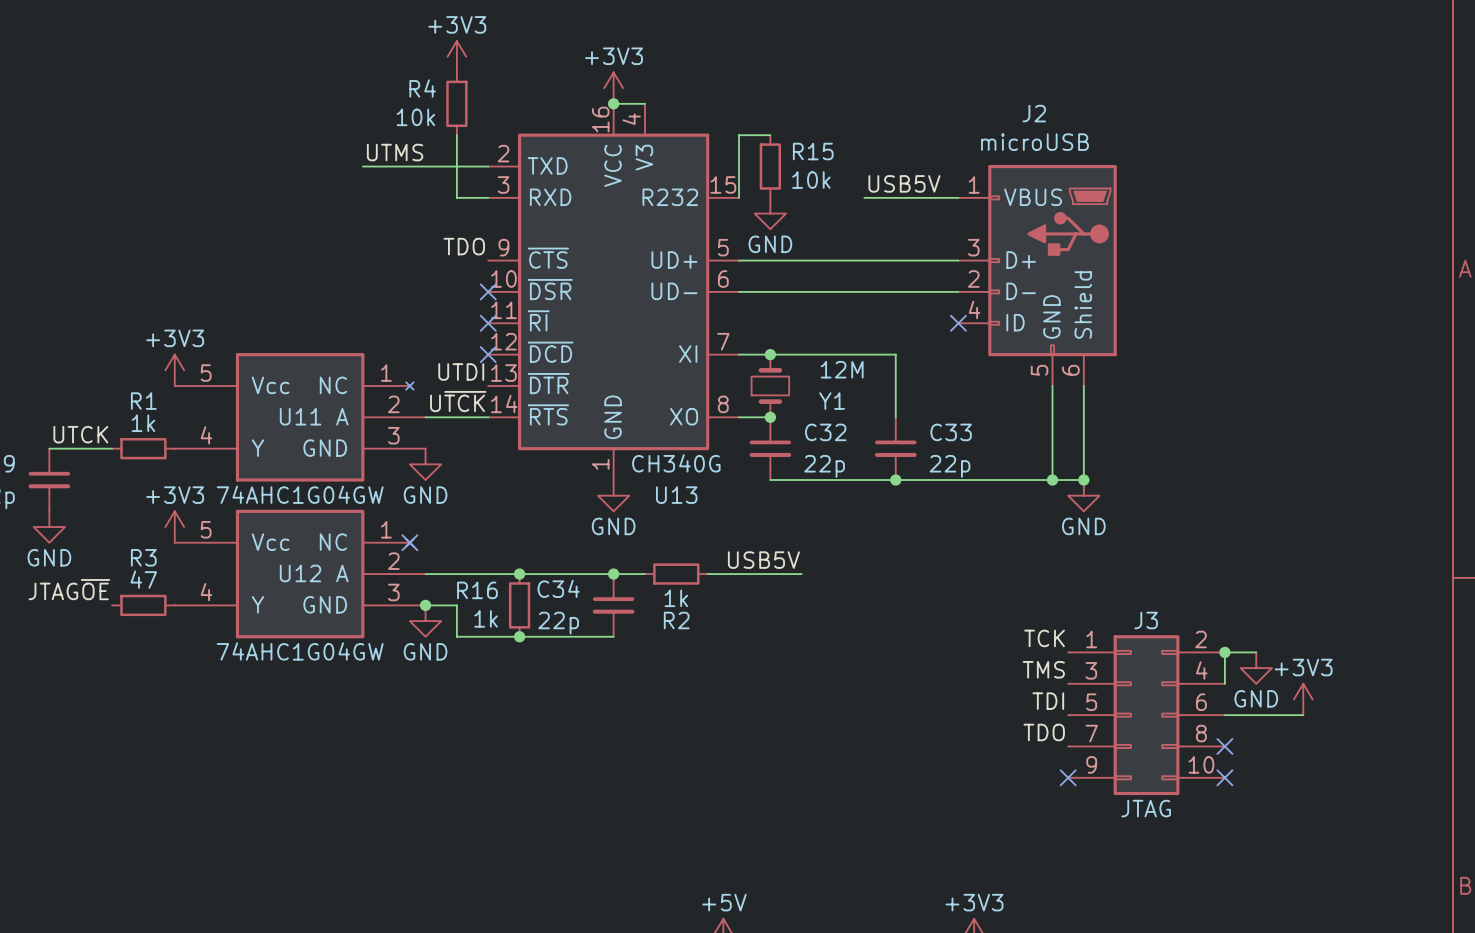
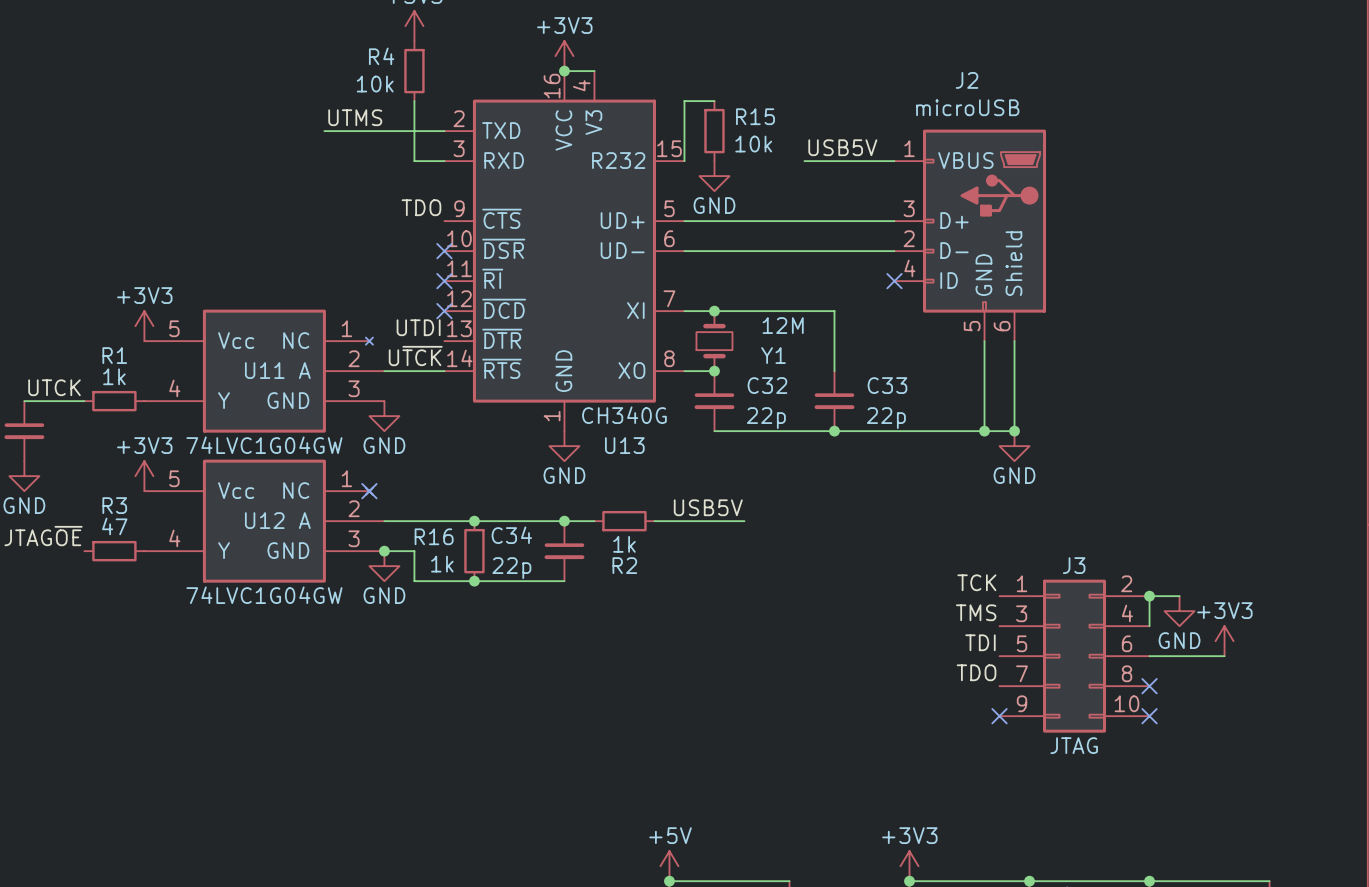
U11 value: 74AHC1G04GW (300, 494) -> 74LVC1G04GW (264, 445)
U12 value: 74AHC1G04GW (300, 651) -> 74LVC1G04GW (264, 595)

